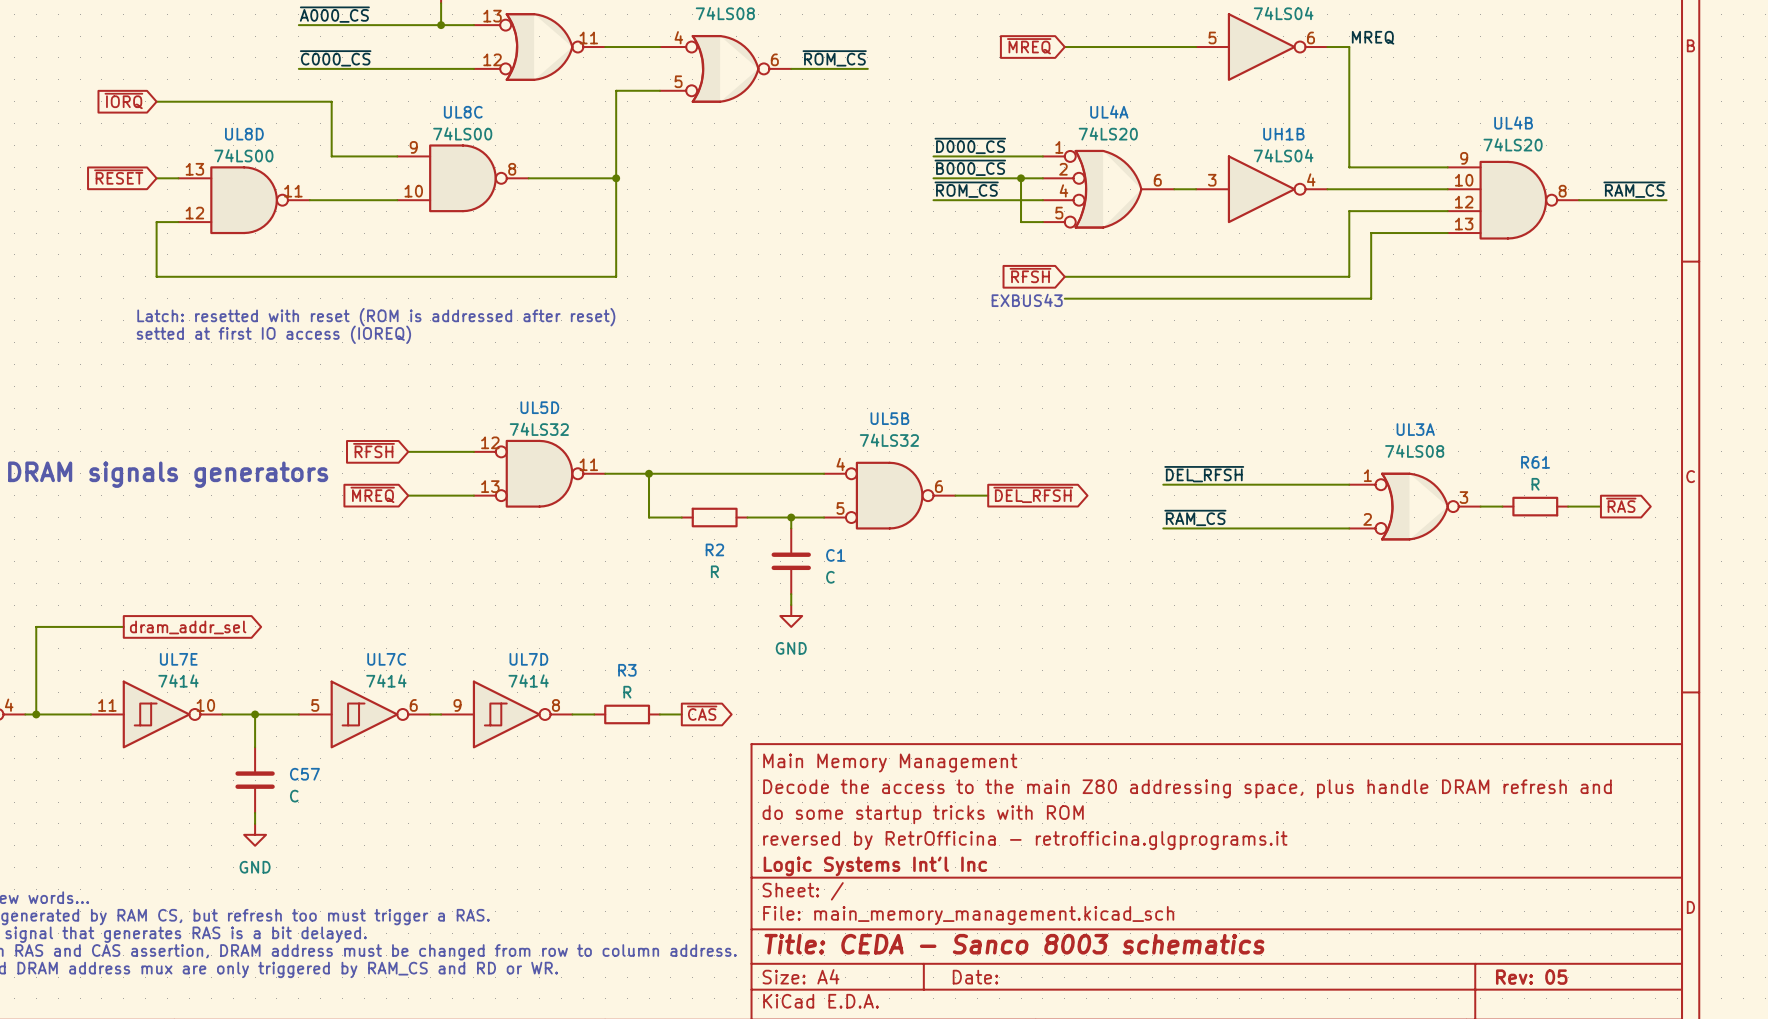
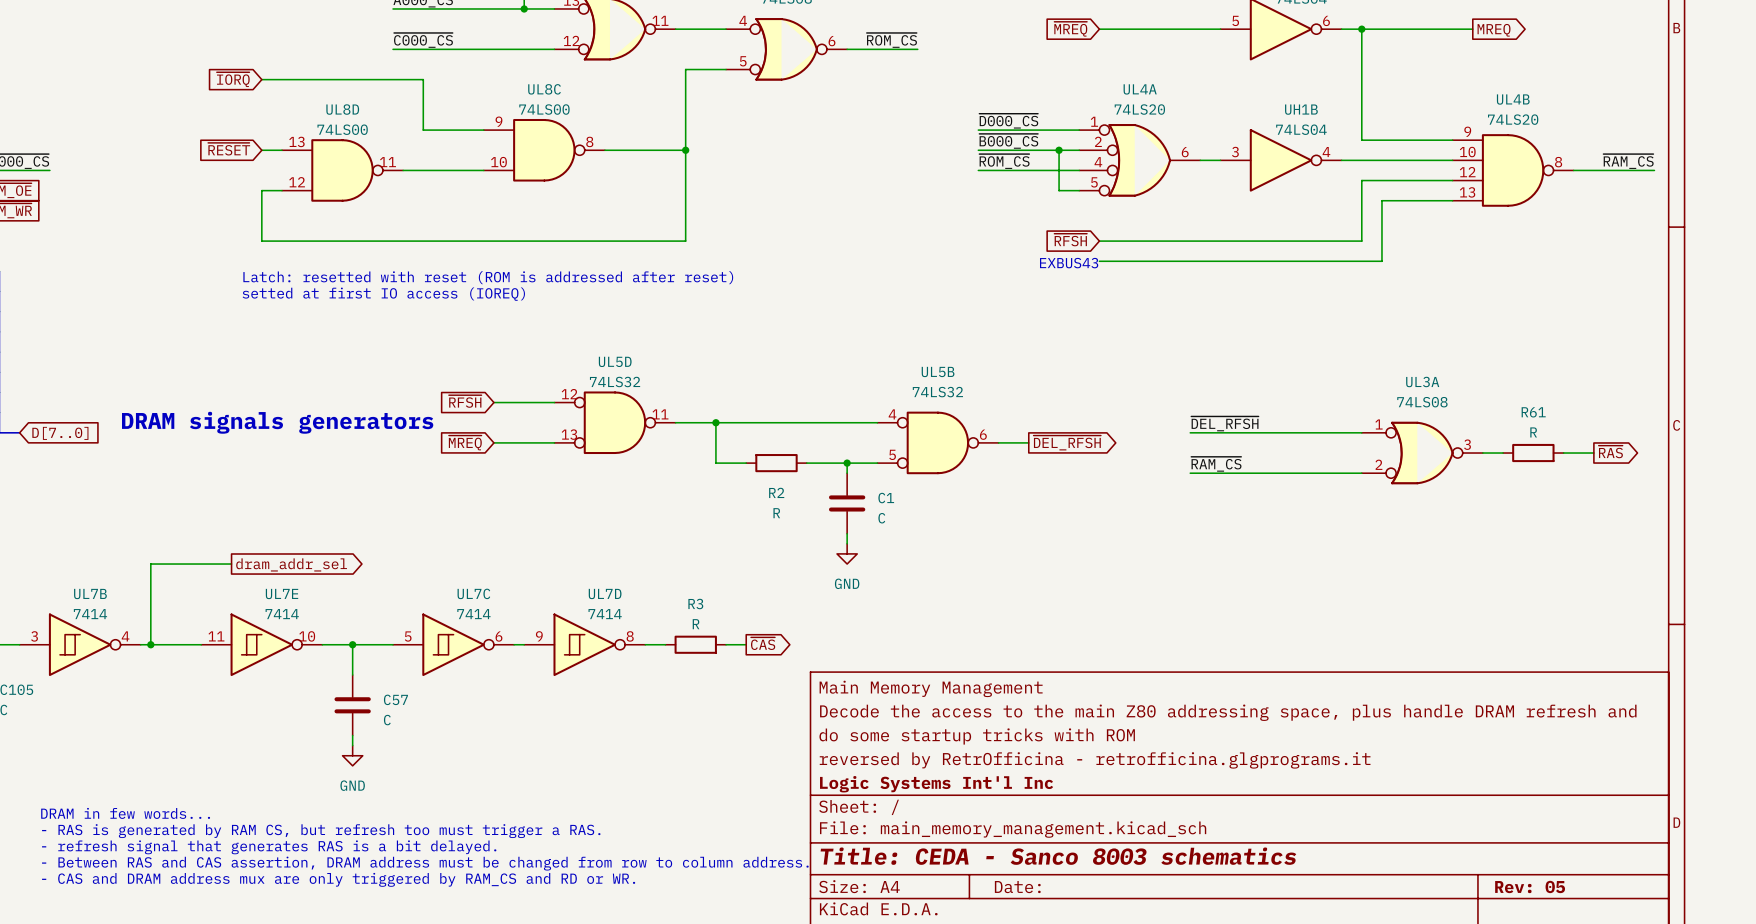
label: MREQ (1373, 37) -> none
wire: none -> (1361, 29) (1472, 29)
junction: none -> (1361, 29)
global label: none -> MREQ (1494, 30)

